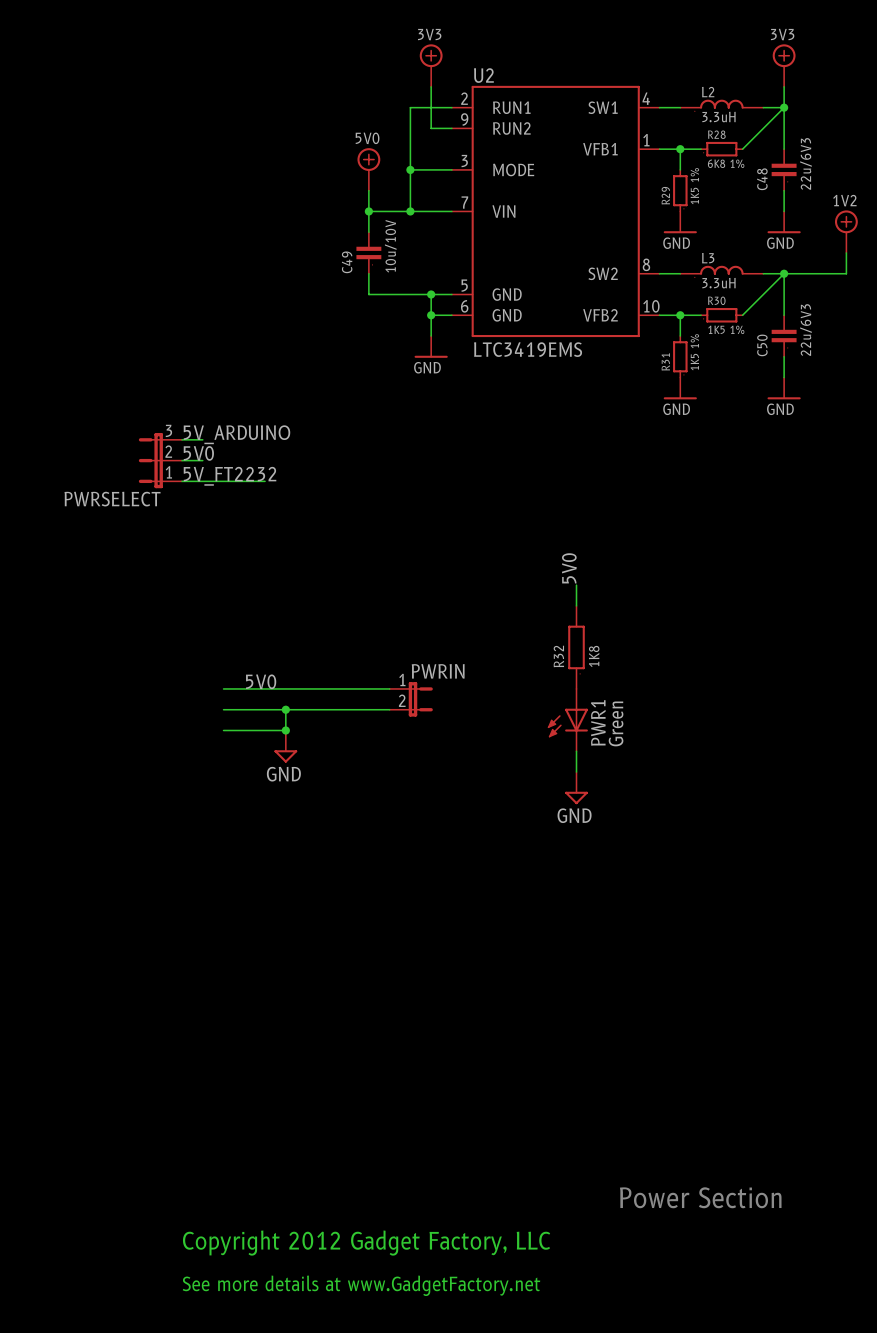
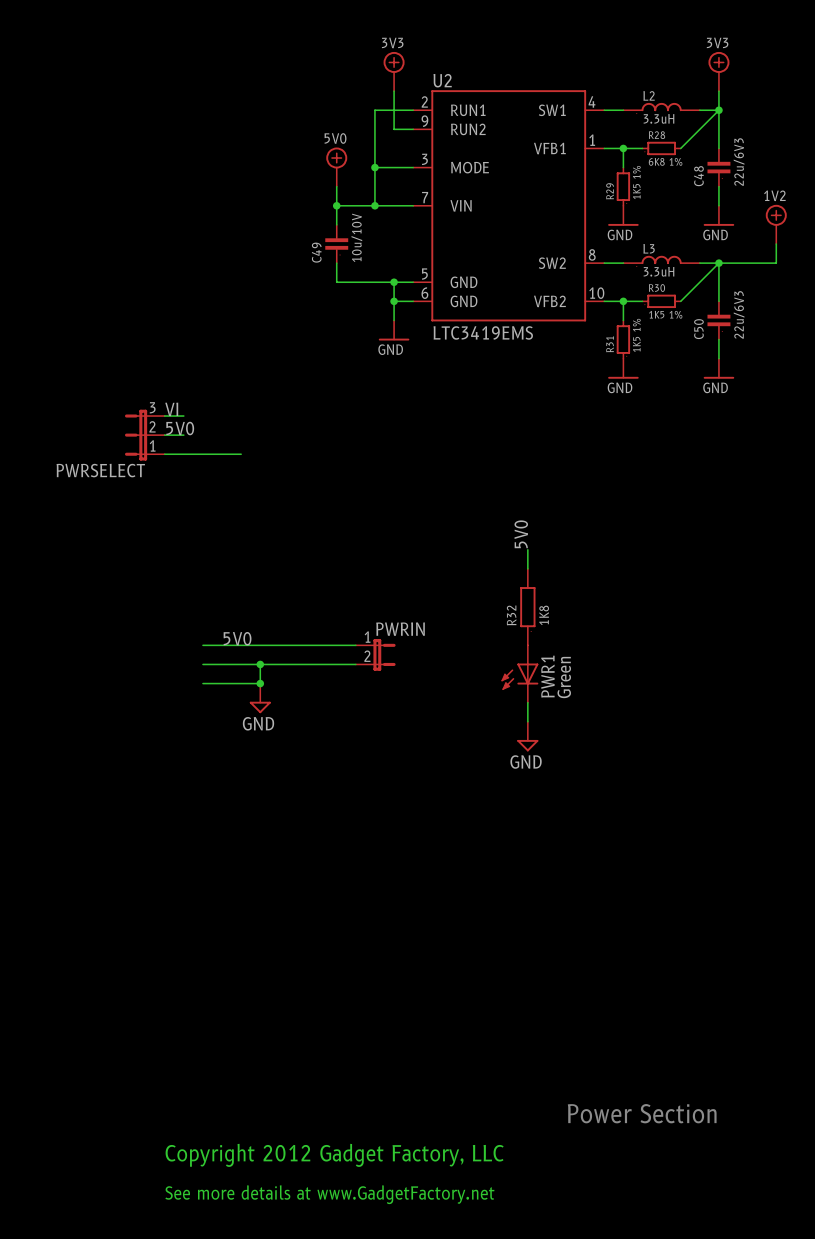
label: 5V_ARDUINO (236, 434) -> VI (171, 409)
label: 5V_FT2232 (230, 476) -> none

